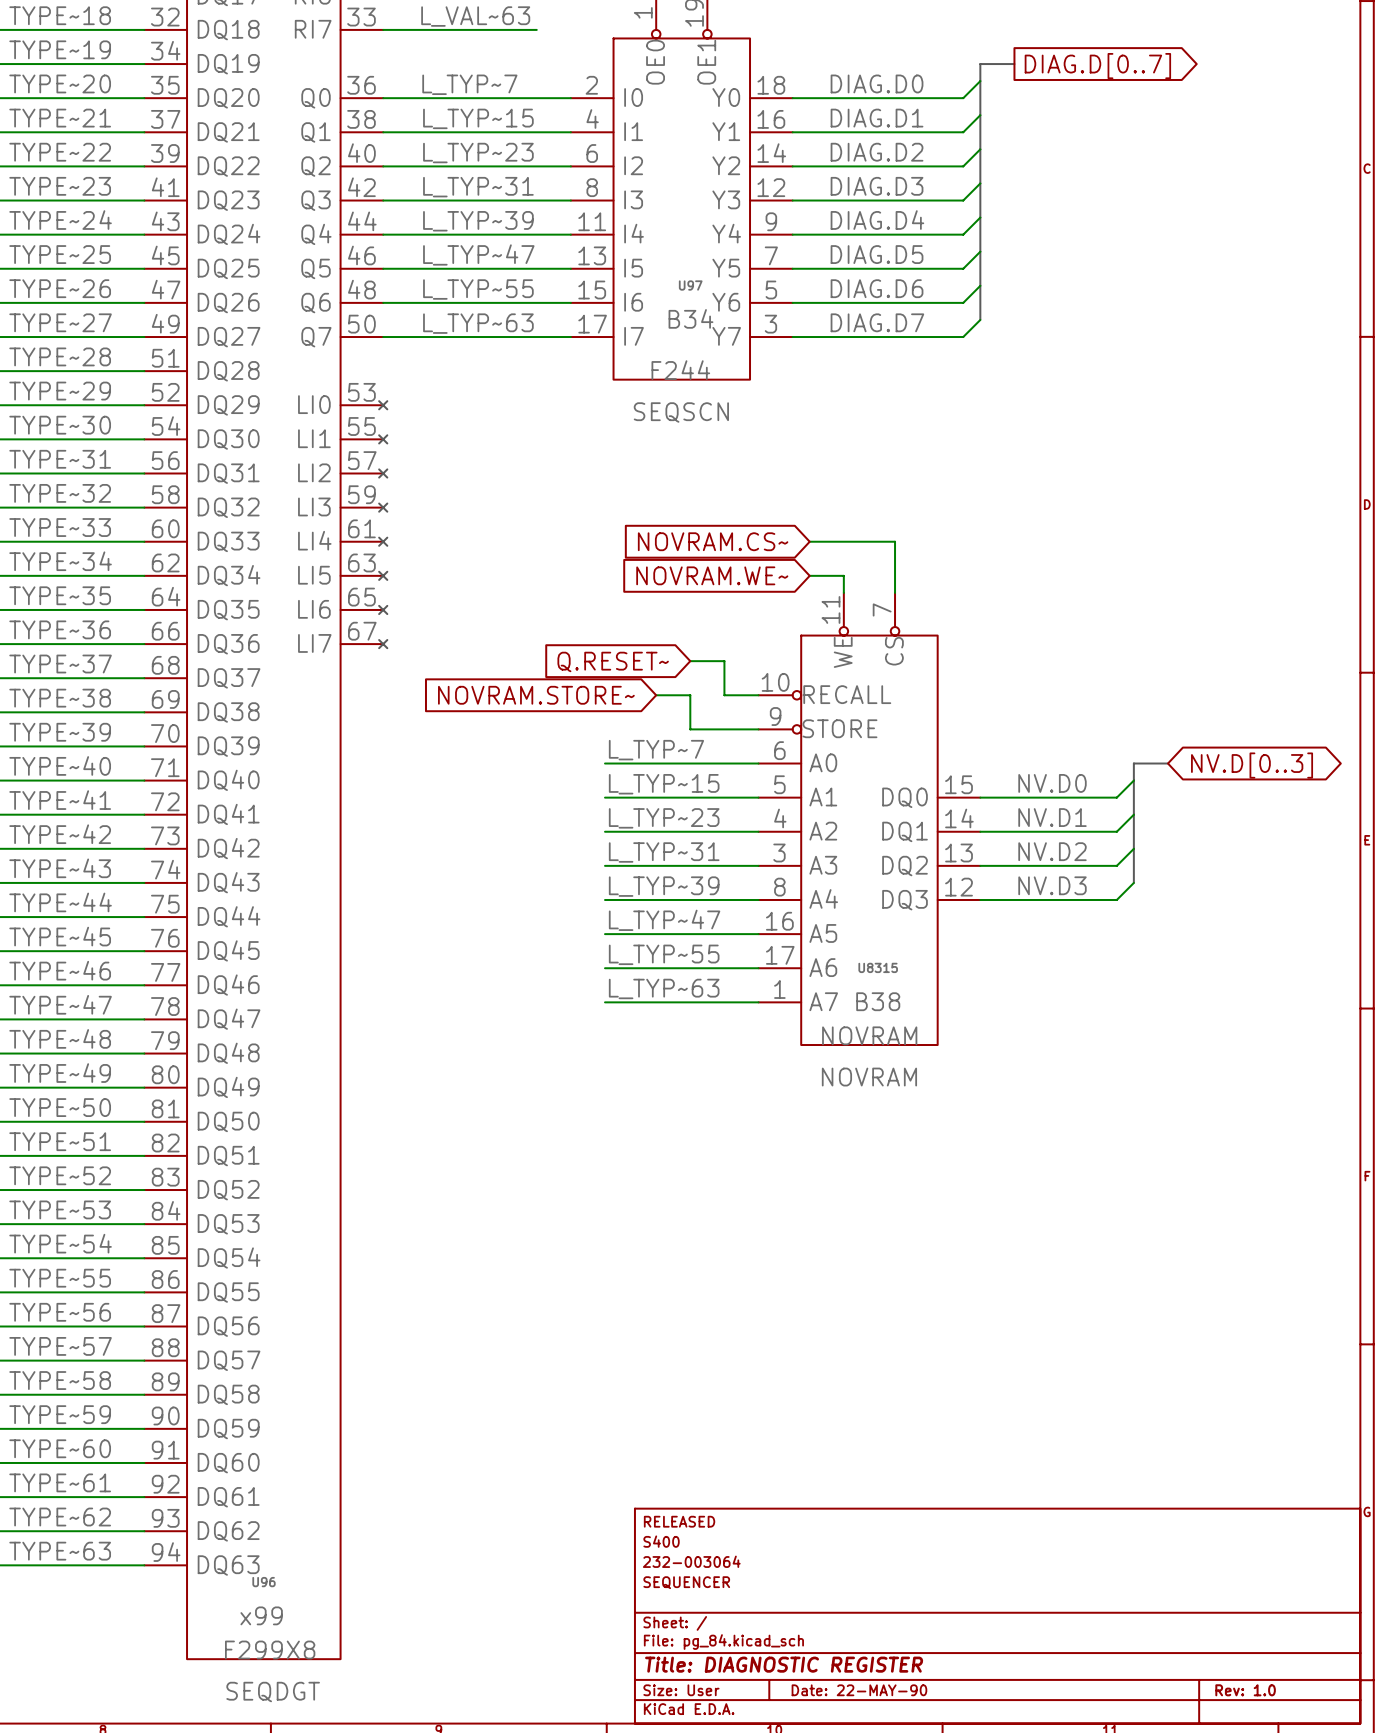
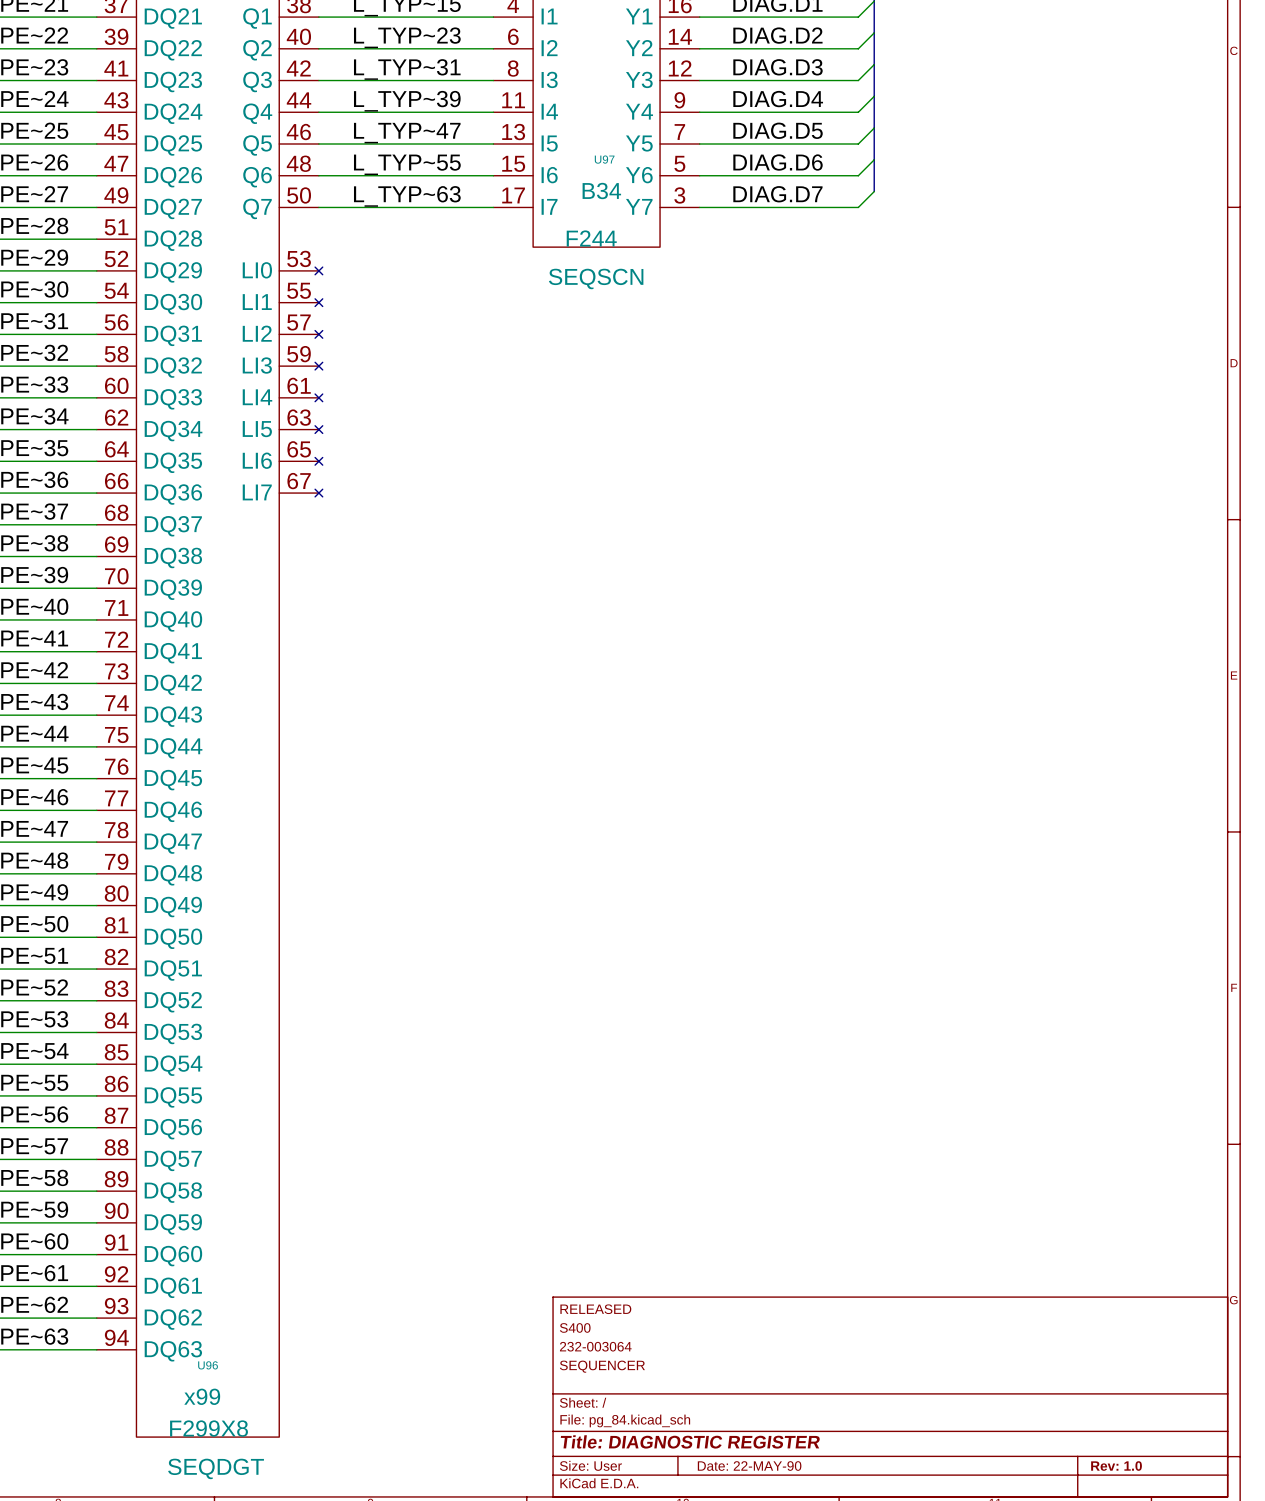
global label: NOVRAM.CS~ (713, 541) -> none
wire: (809, 541) (895, 541) (895, 592) -> none
global label: NOVRAM.WE~ (712, 575) -> none
wire: (809, 575) (843, 575) (843, 592) -> none
global label: Q.RESET~ (613, 661) -> none
wire: (690, 661) (724, 661) (724, 695) (758, 695) -> none
global label: NOVRAM.STORE~ (536, 695) -> none
wire: (656, 695) (690, 695) (690, 729) (758, 729) -> none
label: L_TYP~7 (656, 750) -> none
wire: (605, 763) (758, 763) -> none
bus: (1167, 763) (1133, 763) (1133, 882) -> none
global label: NV.D[0..3] (1252, 765) -> none
wire: (1133, 780) (1116, 797) (980, 797) -> none
label: NV.D0 (1052, 783) -> none
label: L_TYP~15 (664, 784) -> none
wire: (605, 797) (758, 797) -> none
wire: (1133, 814) (1116, 831) (980, 831) -> none
label: NV.D1 (1052, 817) -> none
label: L_TYP~23 (664, 818) -> none
U8315: NOVRAM (869, 818) -> none
wire: (605, 831) (758, 831) -> none
wire: (1133, 848) (1116, 865) (980, 865) -> none
label: NV.D2 (1052, 851) -> none
label: L_TYP~31 (664, 852) -> none
wire: (605, 865) (758, 865) -> none
wire: (1133, 882) (1116, 899) (980, 899) -> none
label: NV.D3 (1052, 885) -> none
label: L_TYP~39 (664, 886) -> none
wire: (605, 899) (758, 899) -> none
label: L_TYP~47 (664, 920) -> none
wire: (605, 934) (758, 934) -> none
label: L_TYP~55 (664, 954) -> none
wire: (605, 968) (758, 968) -> none
label: L_TYP~63 (664, 988) -> none
wire: (605, 1002) (758, 1002) -> none

